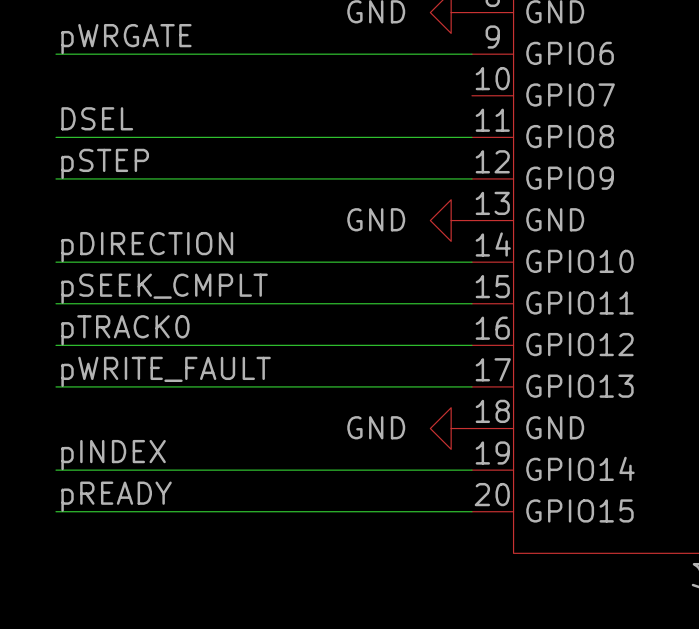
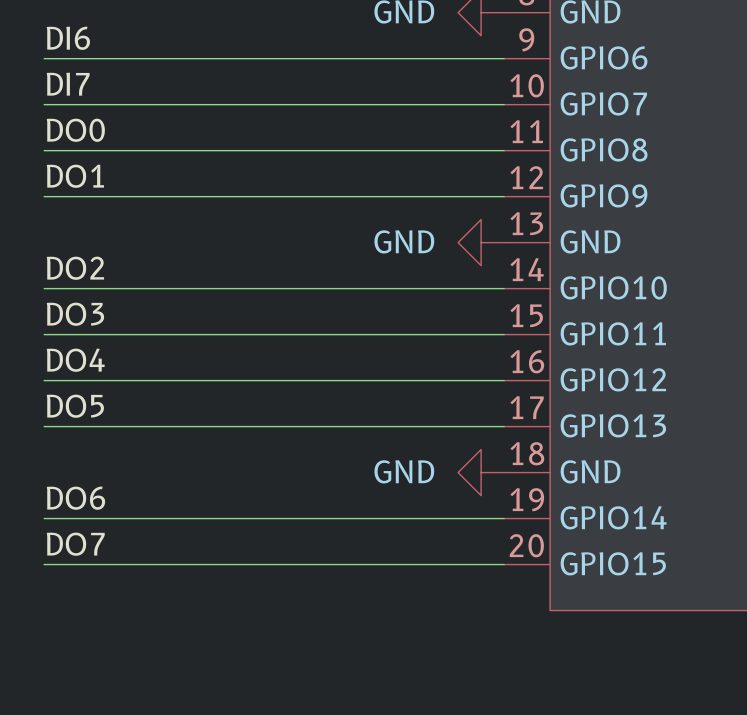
label: pWRGATE (126, 39) -> DI6 (68, 38)
label: none -> DI7 (68, 84)
wire: none -> (44, 104) (504, 104)
label: DSEL (97, 118) -> DO0 (75, 130)
label: pSTEP (105, 163) -> DO1 (75, 176)
label: pDIRECTION (147, 247) -> DO2 (75, 268)
label: pSEEK_CMPLT (164, 288) -> DO3 (75, 314)
label: pTRACK0 (125, 330) -> DO4 (75, 360)
label: pWRITE_FAULT (166, 371) -> DO5 (75, 406)
label: pINDEX (113, 455) -> DO6 (75, 498)
label: pREADY (116, 496) -> DO7 (75, 544)

